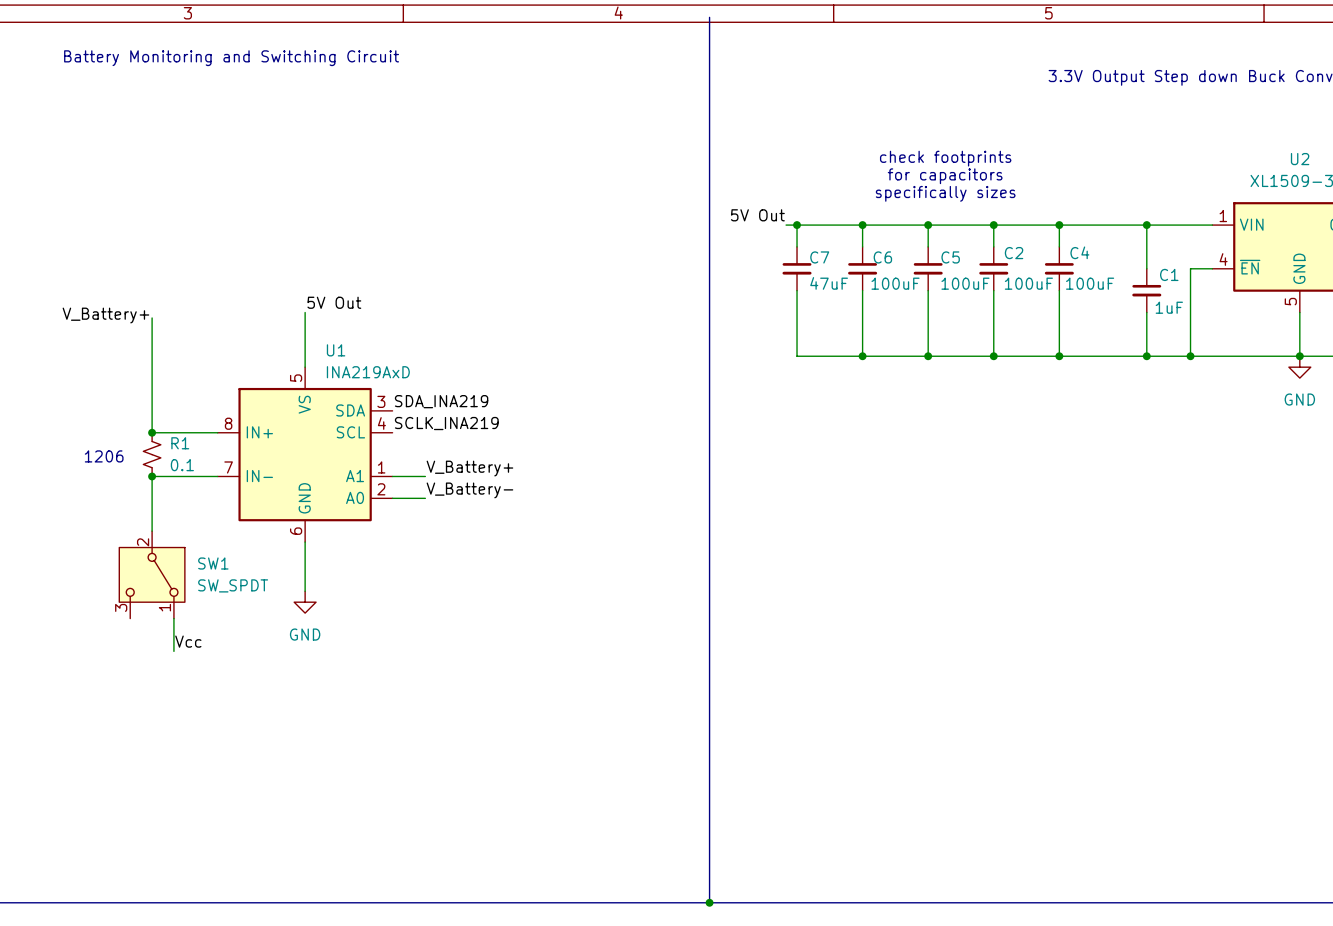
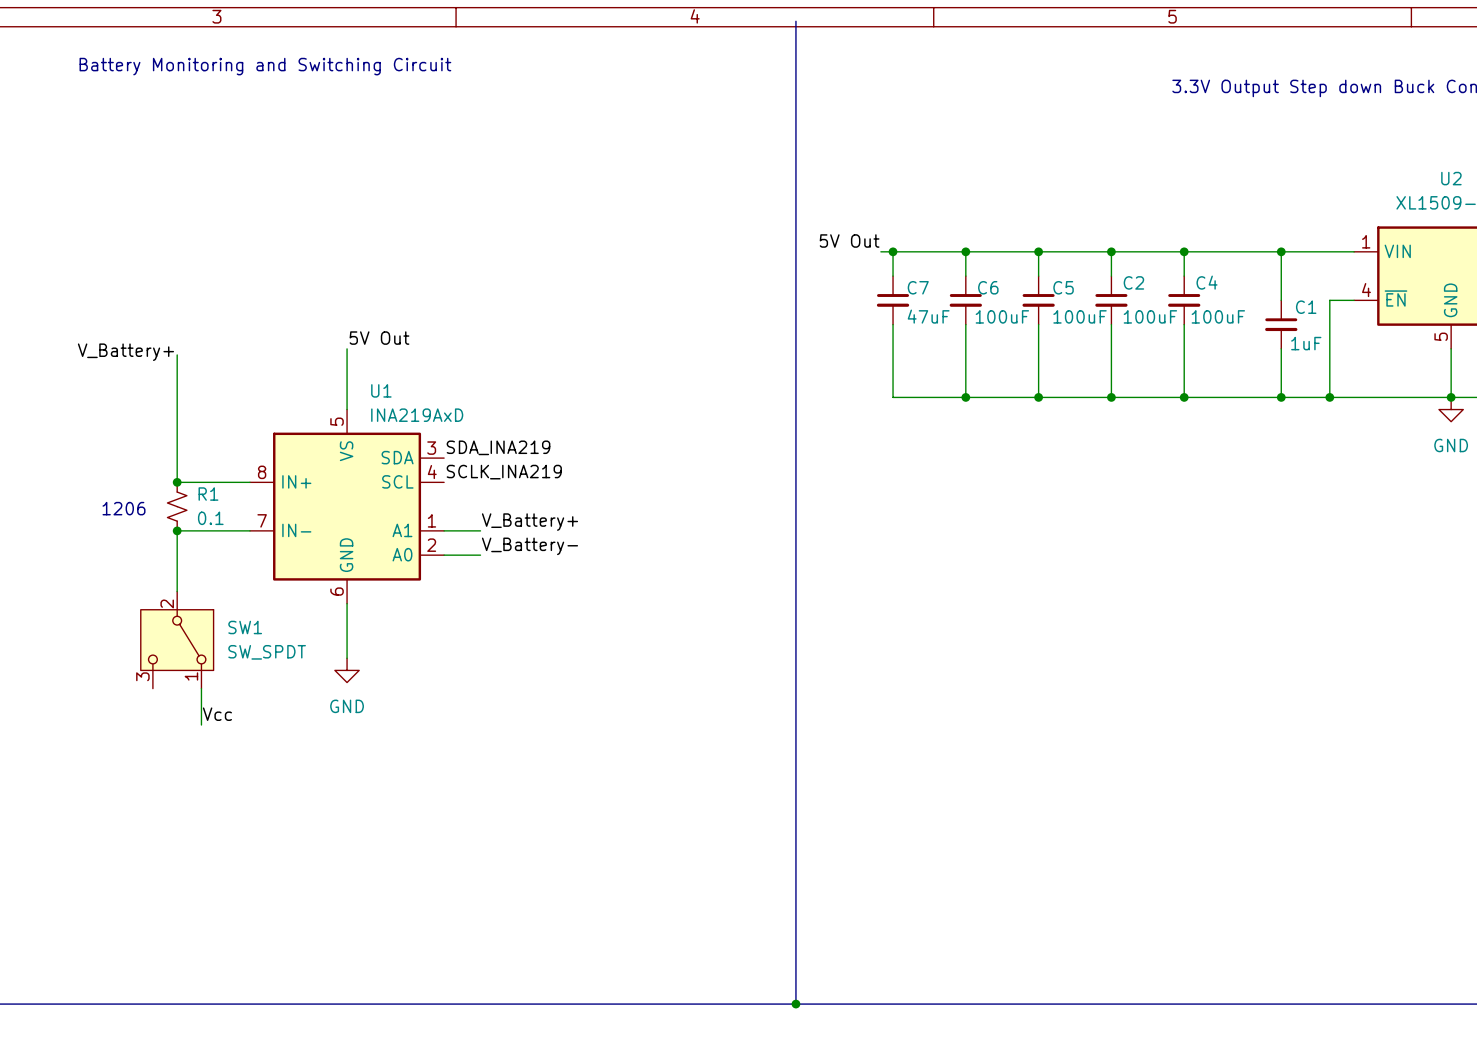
text: check footprints (945, 158) -> none
text: for capacitors (945, 176) -> none
text: specifically sizes (945, 193) -> none

